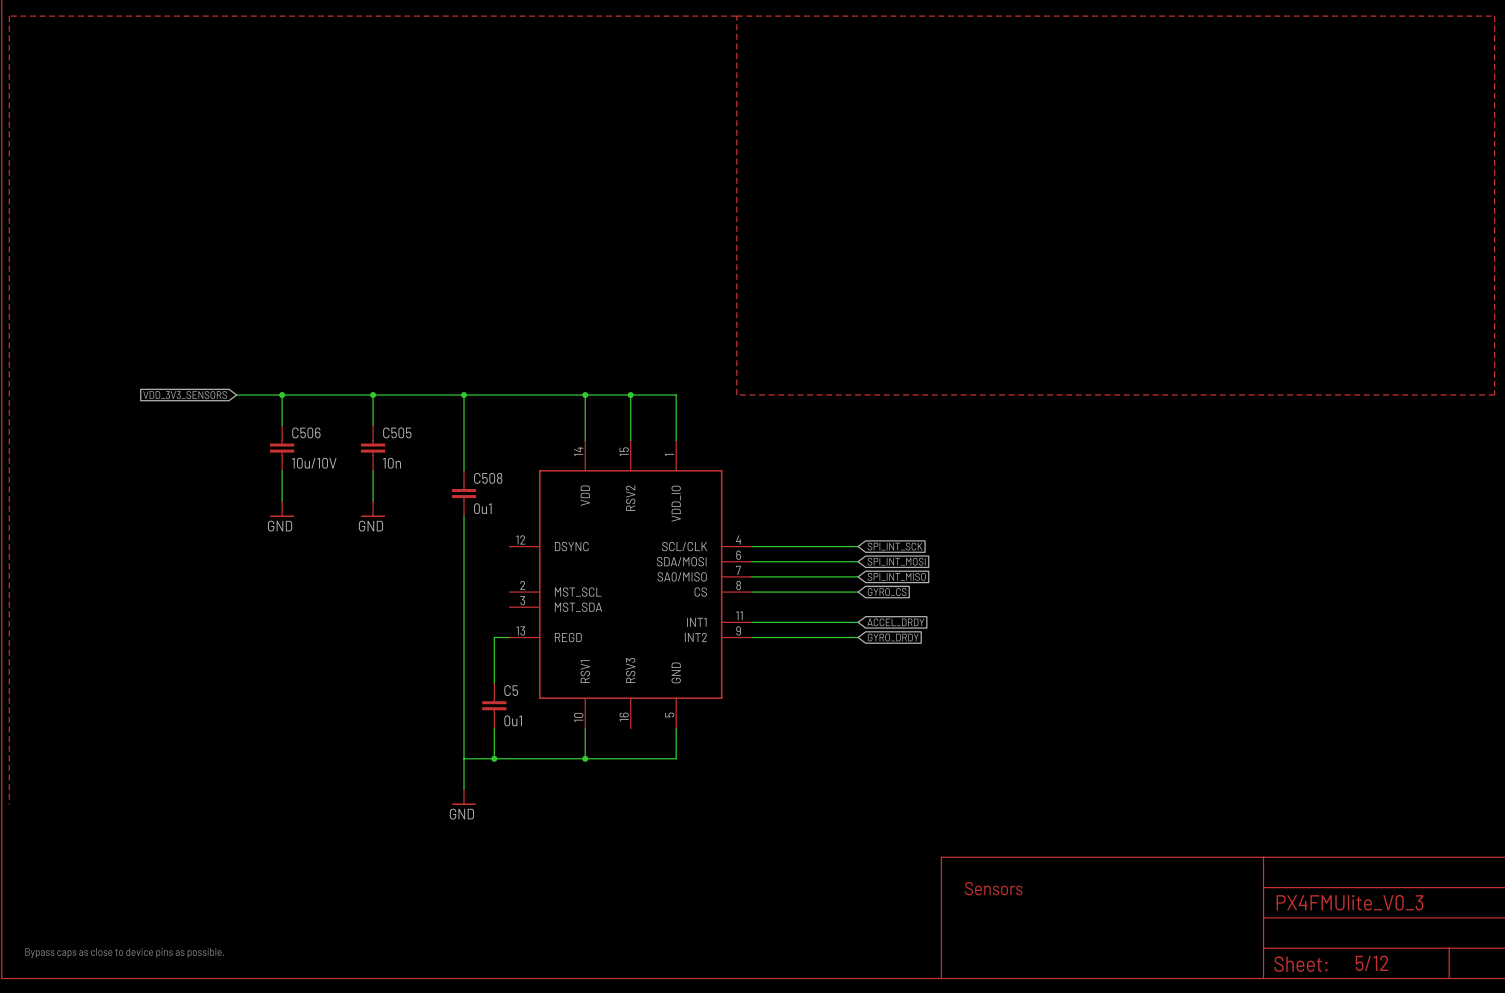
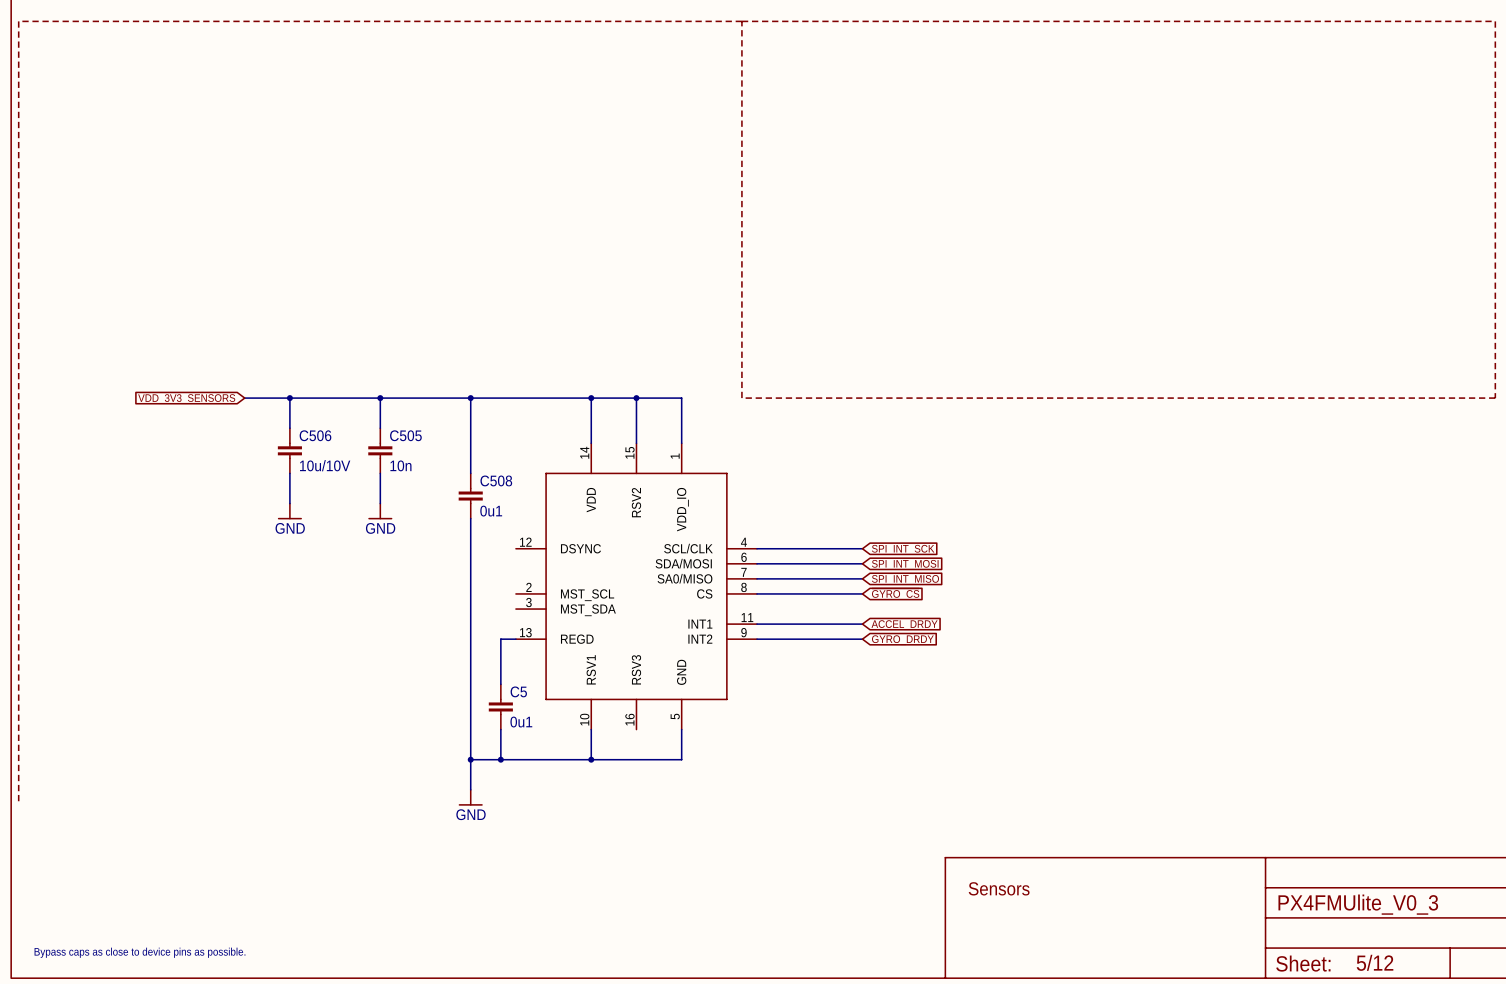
junction: none -> (470, 759)

